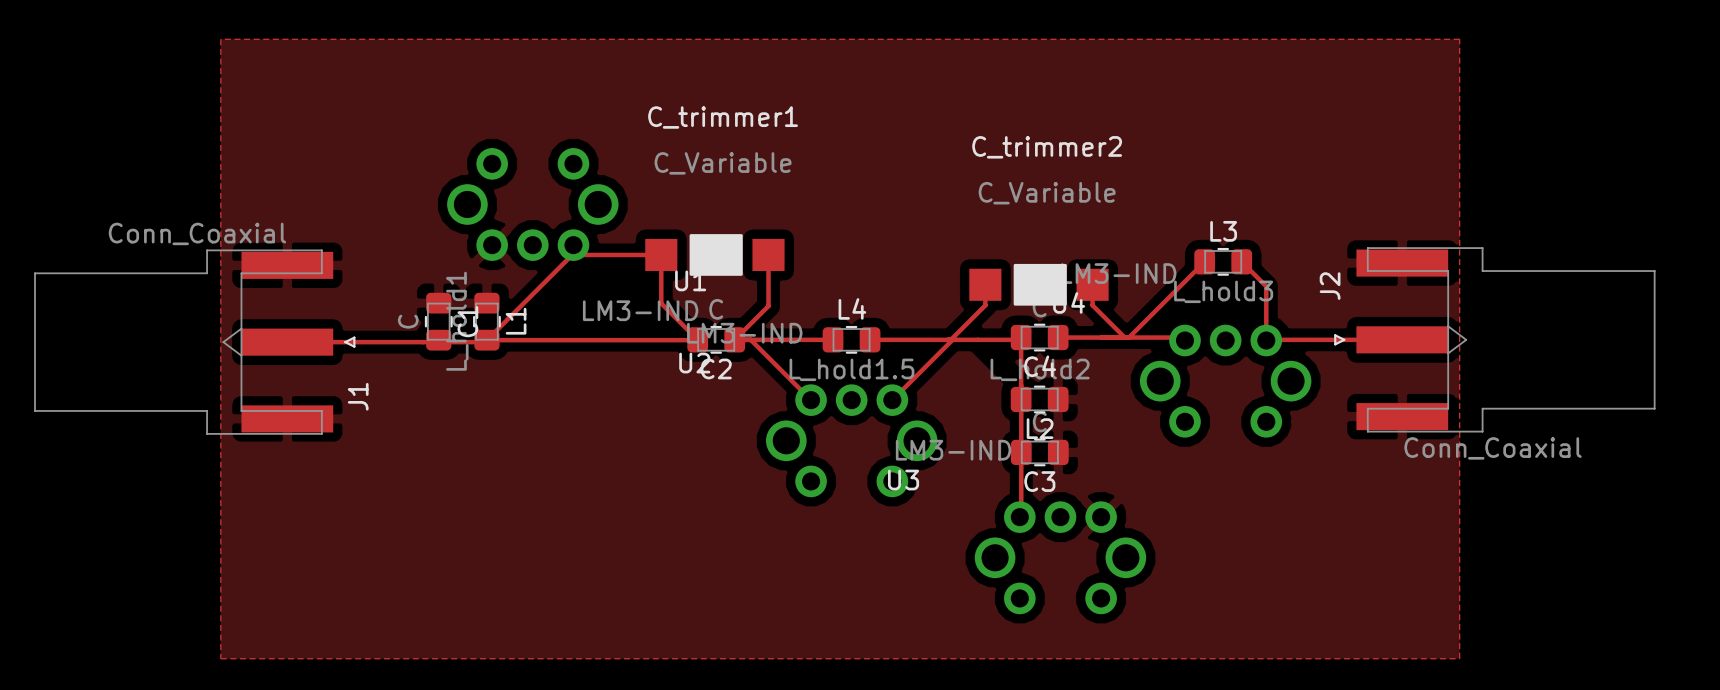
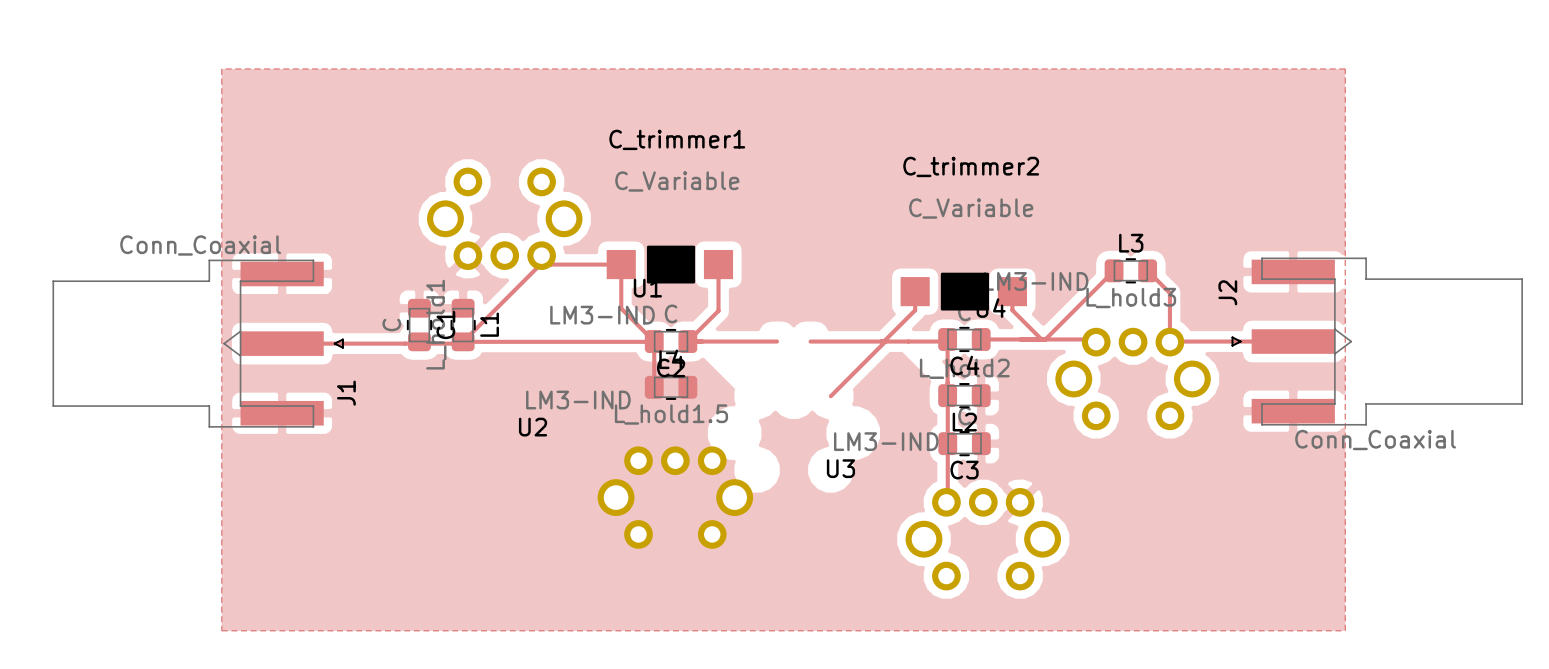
track: none -> (654, 341) (654, 387)
track: (750, 339) (811, 400) -> none
L4 position: (851, 339) -> (671, 387)
U2 position: (851, 440) -> (675, 497)

